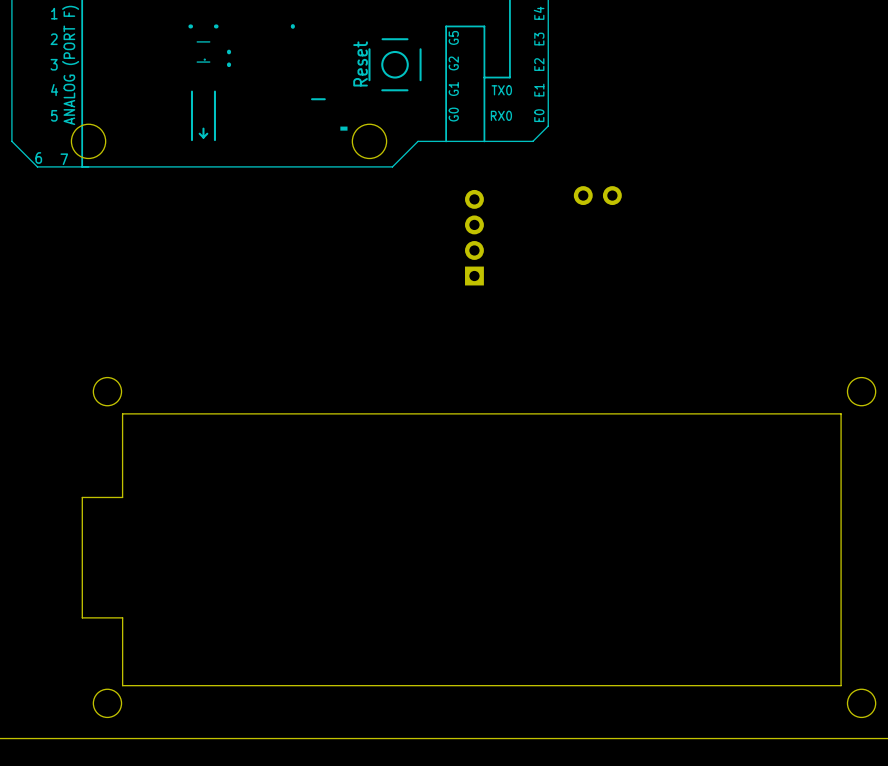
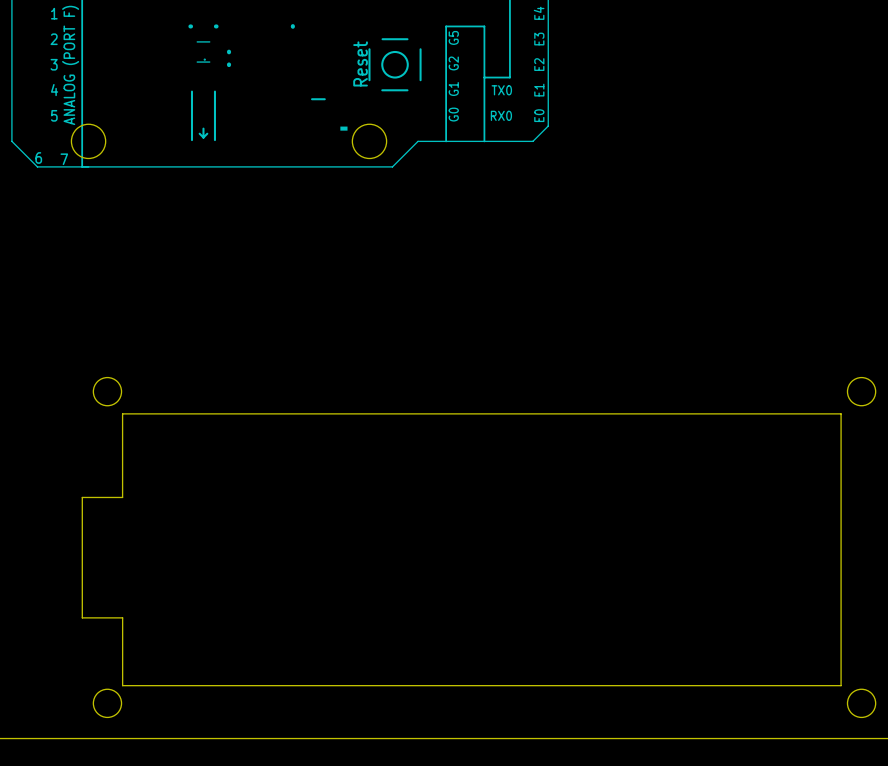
part: (597, 195) -> none
part: (474, 237) -> none

